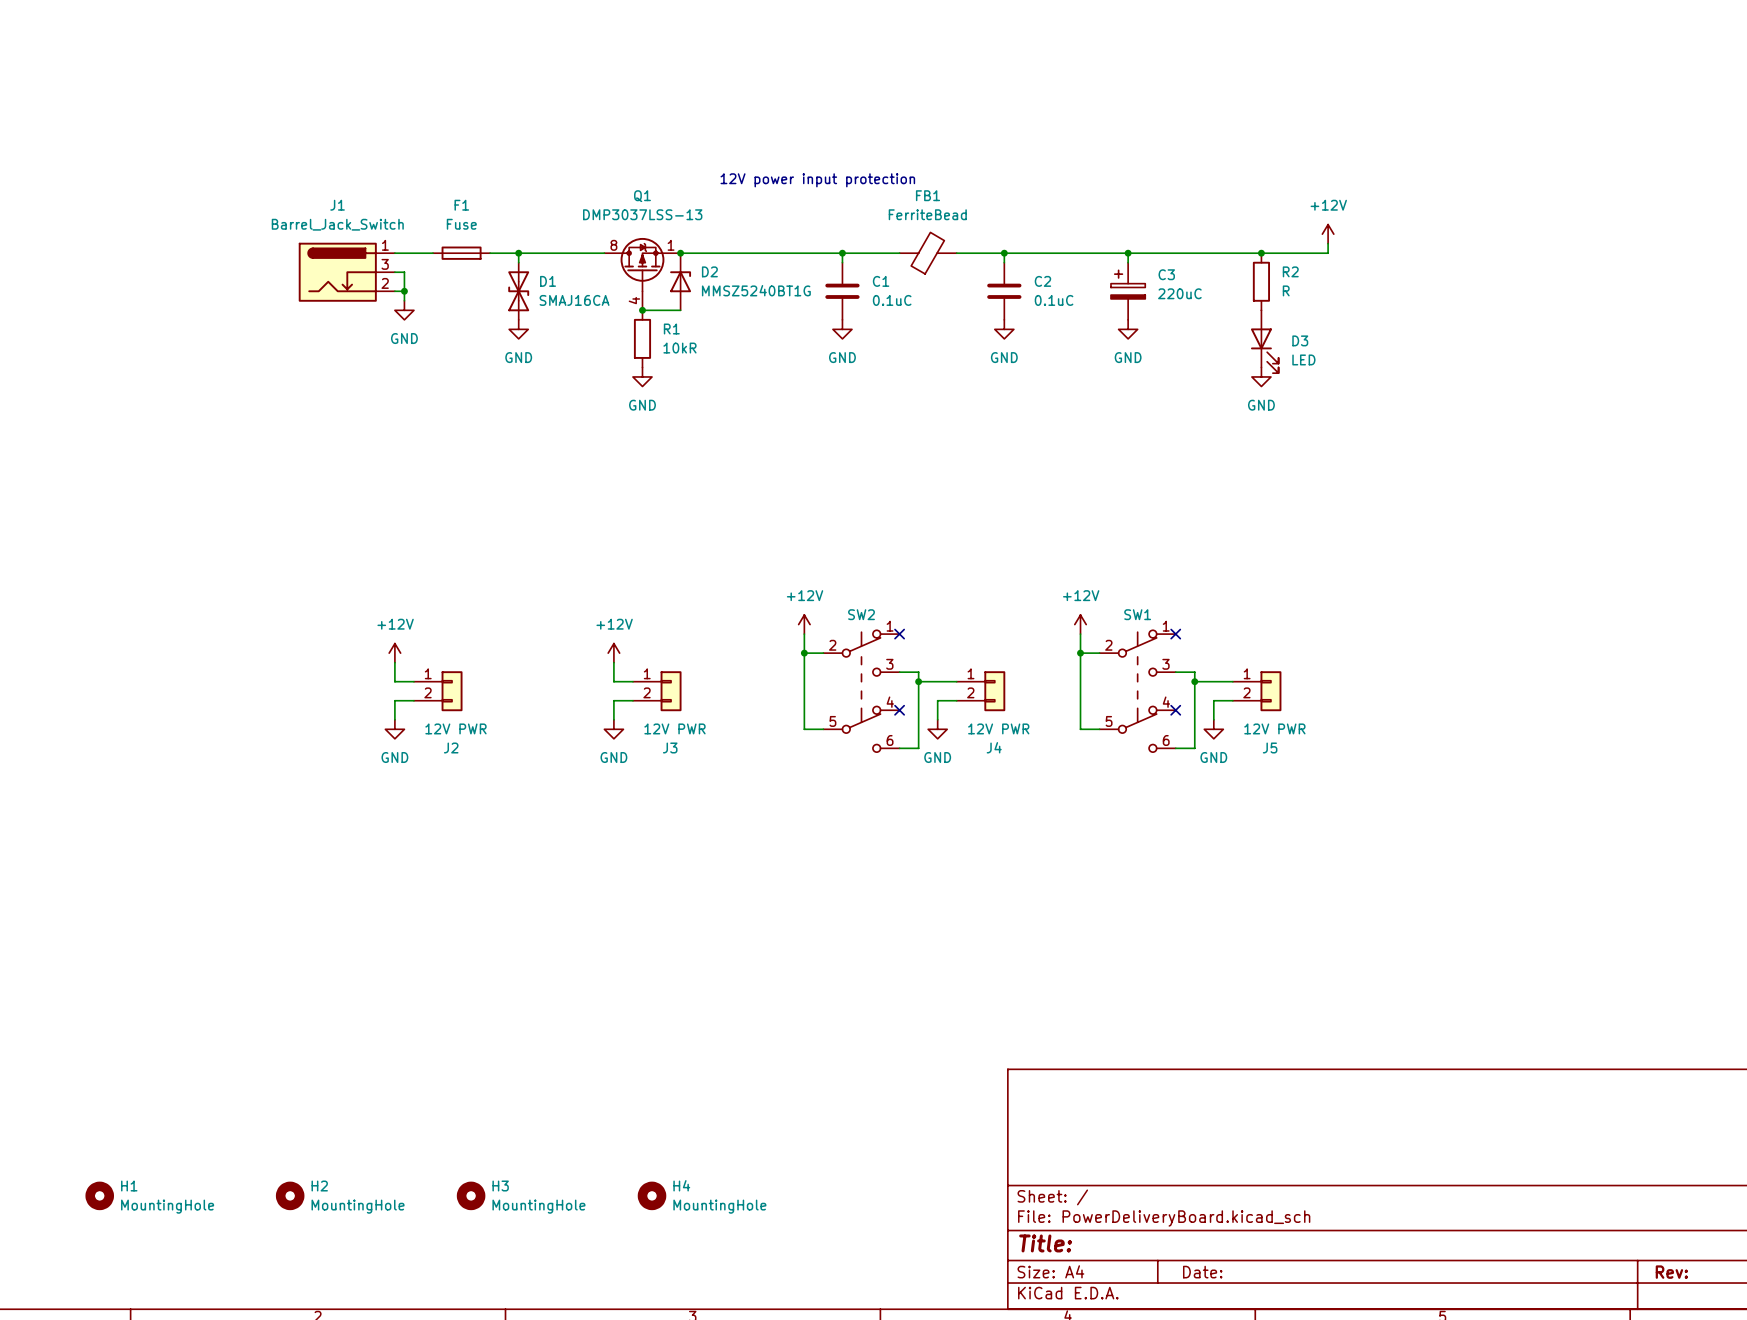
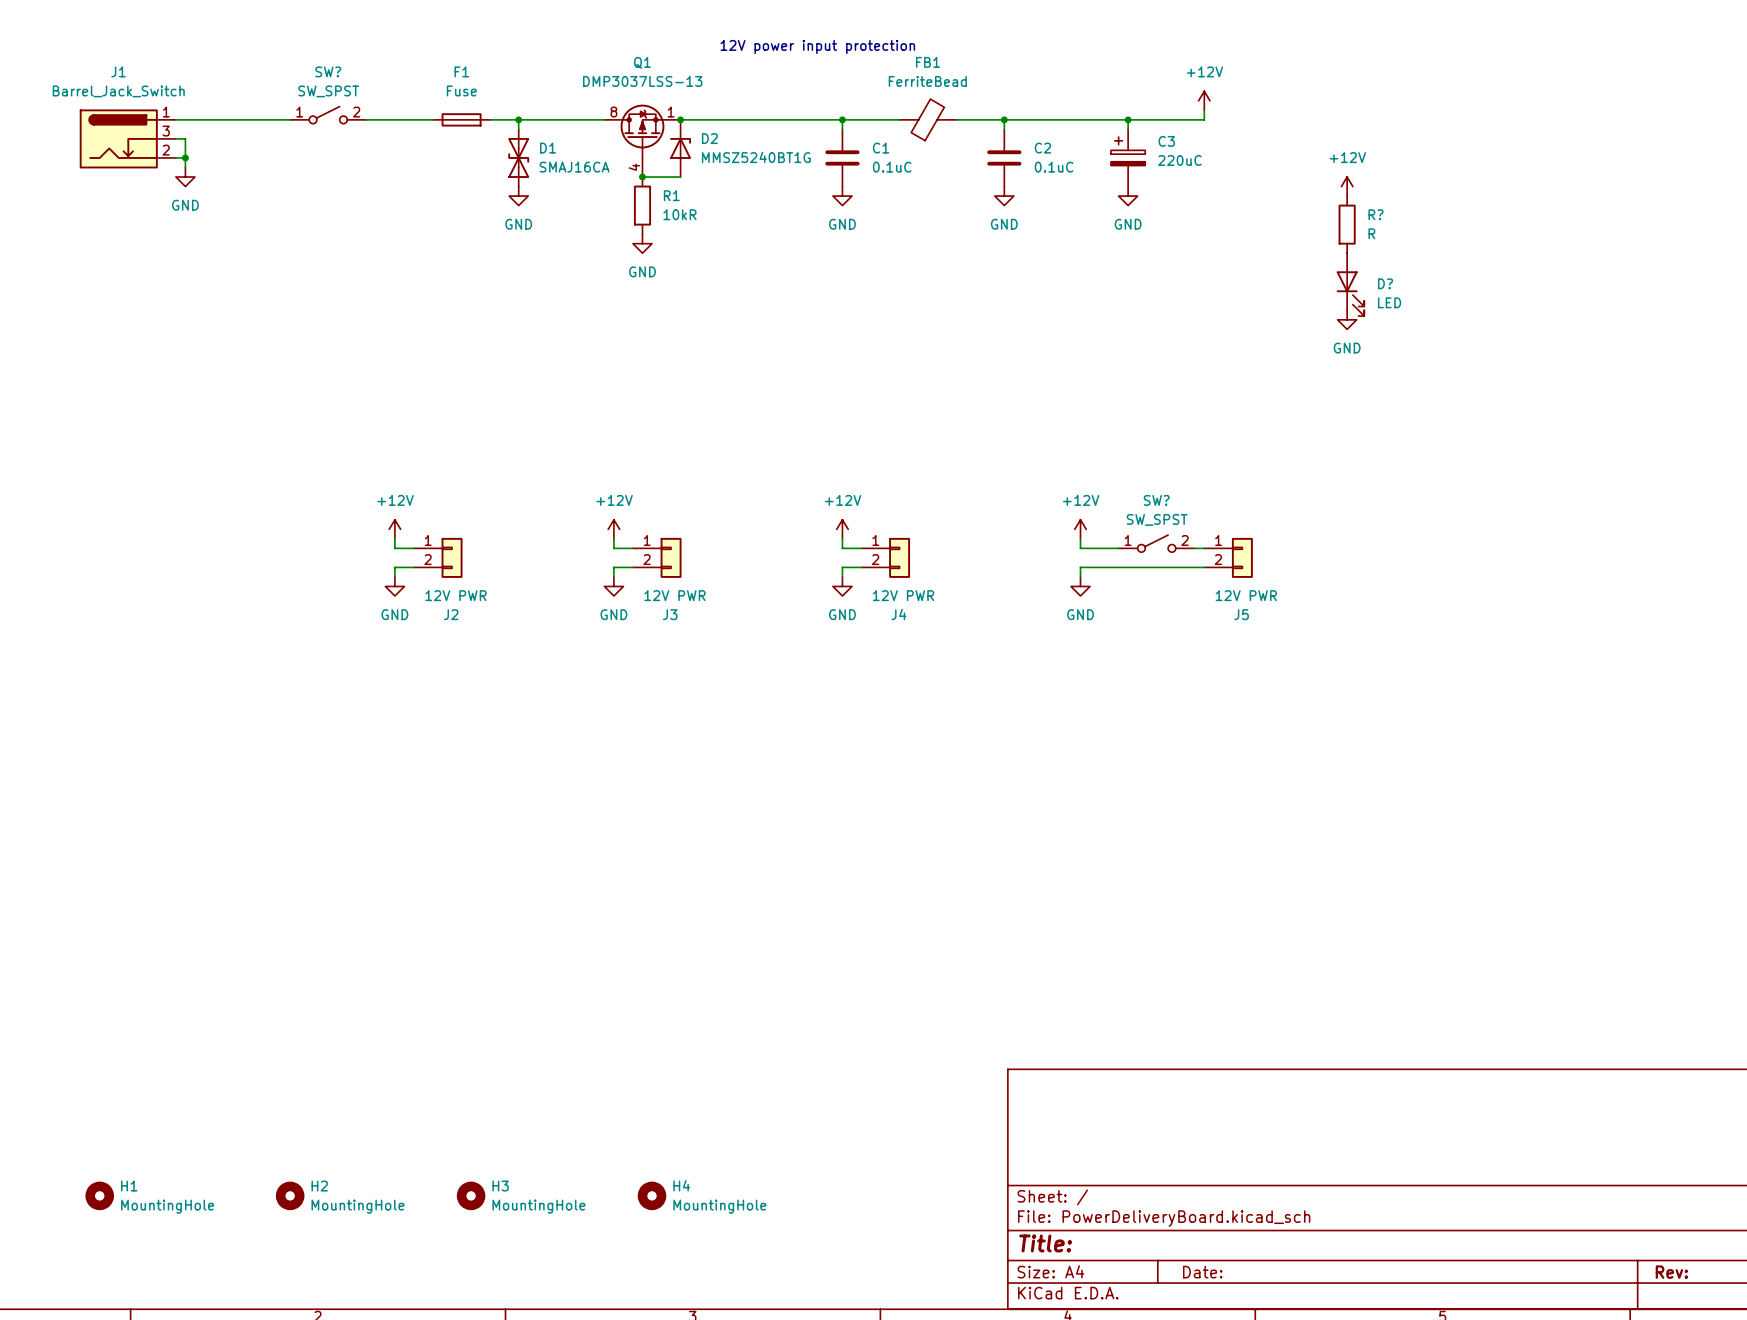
power symbol: none -> +12V (1204, 100)
wire: none -> (1204, 110) (1204, 119) (956, 119)
SW?: none -> SW_SPST (328, 115)
wire: none -> (175, 119) (290, 119)
wire: none -> (366, 119) (433, 119)
junction: none -> (518, 119)
junction: none -> (680, 119)
junction: none -> (842, 119)
junction: none -> (1004, 119)
junction: none -> (1128, 119)
wire: none -> (175, 138) (185, 138) (185, 167)
wire: none -> (175, 157) (185, 157)
junction: none -> (185, 157)
power symbol: none -> GND (185, 177)
junction: none -> (642, 177)
text position: 12V power input protection (817, 180) -> 12V power input protection (817, 47)
power symbol: none -> GND (518, 196)
power symbol: none -> GND (842, 196)
power symbol: none -> GND (1004, 196)
power symbol: none -> GND (1128, 196)
R?: none -> R (1347, 224)
power symbol position: +12V (1328, 234) -> +12V (1347, 186)
power symbol: none -> GND (642, 243)
wire: (1328, 243) (1328, 253) (956, 253) -> none
wire: (394, 253) (433, 253) -> none
F1 position: (461, 253) -> (461, 119)
wire: (490, 253) (604, 253) -> (490, 119) (604, 119)
wire: (518, 253) (518, 262) -> (518, 119) (518, 129)
junction: (518, 253) -> none
wire: (680, 253) (899, 253) -> (680, 119) (899, 119)
junction: (680, 253) -> none
wire: (842, 253) (842, 262) -> (842, 119) (842, 129)
junction: (842, 253) -> none
FB1 position: (928, 253) -> (928, 119)
wire: (1004, 253) (1004, 262) -> (1004, 119) (1004, 129)
junction: (1004, 253) -> none
wire: (1128, 253) (1128, 262) -> (1128, 119) (1128, 129)
junction: (1128, 253) -> none
junction: (1261, 253) -> none
J1 position: (346, 272) -> (127, 138)
wire: (394, 272) (404, 272) (404, 300) -> none
Q1 position: (642, 274) -> (642, 140)
D2 position: (680, 281) -> (680, 148)
R2: R (1261, 281) -> none
D?: none -> LED (1350, 284)
wire: (394, 291) (404, 291) -> none
junction: (404, 291) -> none
D1 position: (518, 291) -> (518, 157)
C1 position: (842, 291) -> (842, 157)
C2 position: (1004, 291) -> (1004, 157)
C3 position: (1128, 291) -> (1128, 157)
power symbol: GND (404, 310) -> none
wire: (642, 310) (680, 310) -> (642, 177) (680, 177)
junction: (642, 310) -> none
power symbol: GND (518, 329) -> none
power symbol: GND (842, 329) -> none
power symbol: GND (1004, 329) -> none
power symbol: GND (1128, 329) -> none
R1 position: (642, 338) -> (642, 205)
D3: LED (1264, 341) -> none
power symbol: GND (642, 376) -> none
power symbol position: GND (1261, 376) -> GND (1347, 319)
power symbol: none -> +12V (613, 529)
wire: none -> (394, 538) (394, 548) (413, 548)
wire: none -> (613, 538) (613, 548) (632, 548)
wire: none -> (842, 538) (842, 548) (861, 548)
wire: none -> (1080, 538) (1080, 548) (1118, 548)
SW?: none -> SW_SPST (1156, 543)
wire: none -> (1194, 548) (1204, 548)
wire: none -> (413, 567) (394, 567) (394, 576)
wire: none -> (632, 567) (613, 567) (613, 576)
wire: none -> (861, 567) (842, 567) (842, 576)
wire: none -> (1204, 567) (1080, 567) (1080, 576)
power symbol: none -> GND (394, 586)
power symbol: none -> GND (613, 586)
power symbol: none -> GND (842, 586)
power symbol: none -> GND (1080, 586)
power symbol position: +12V (804, 624) -> +12V (842, 529)
power symbol position: +12V (1080, 624) -> +12V (1080, 529)
wire: (804, 634) (804, 729) (823, 729) -> none
no-connect mark: (899, 634) -> none
wire: (1080, 634) (1080, 729) (1099, 729) -> none
no-connect mark: (1175, 634) -> none
power symbol position: +12V (394, 653) -> +12V (394, 529)
power symbol: +12V (613, 653) -> none
wire: (804, 653) (823, 653) -> none
junction: (804, 653) -> none
wire: (1080, 653) (1099, 653) -> none
junction: (1080, 653) -> none
wire: (394, 662) (394, 681) (413, 681) -> none
wire: (613, 662) (613, 681) (632, 681) -> none
wire: (899, 672) (918, 672) (918, 748) (899, 748) -> none
wire: (1175, 672) (1194, 672) (1194, 748) (1175, 748) -> none
wire: (918, 681) (956, 681) -> none
junction: (918, 681) -> none
wire: (1194, 681) (1232, 681) -> none
junction: (1194, 681) -> none
J2 position: (438, 691) -> (438, 557)
J3 position: (657, 691) -> (657, 557)
SW2: (861, 691) -> none
J4 position: (981, 691) -> (885, 557)
SW1: (1137, 691) -> none
J5 position: (1257, 691) -> (1228, 557)
wire: (413, 700) (394, 700) (394, 719) -> none
wire: (632, 700) (613, 700) (613, 719) -> none
wire: (956, 700) (937, 700) (937, 719) -> none
wire: (1232, 700) (1213, 700) (1213, 719) -> none
no-connect mark: (899, 710) -> none
no-connect mark: (1175, 710) -> none
power symbol: GND (394, 729) -> none
power symbol: GND (613, 729) -> none
power symbol: GND (937, 729) -> none
power symbol: GND (1213, 729) -> none

